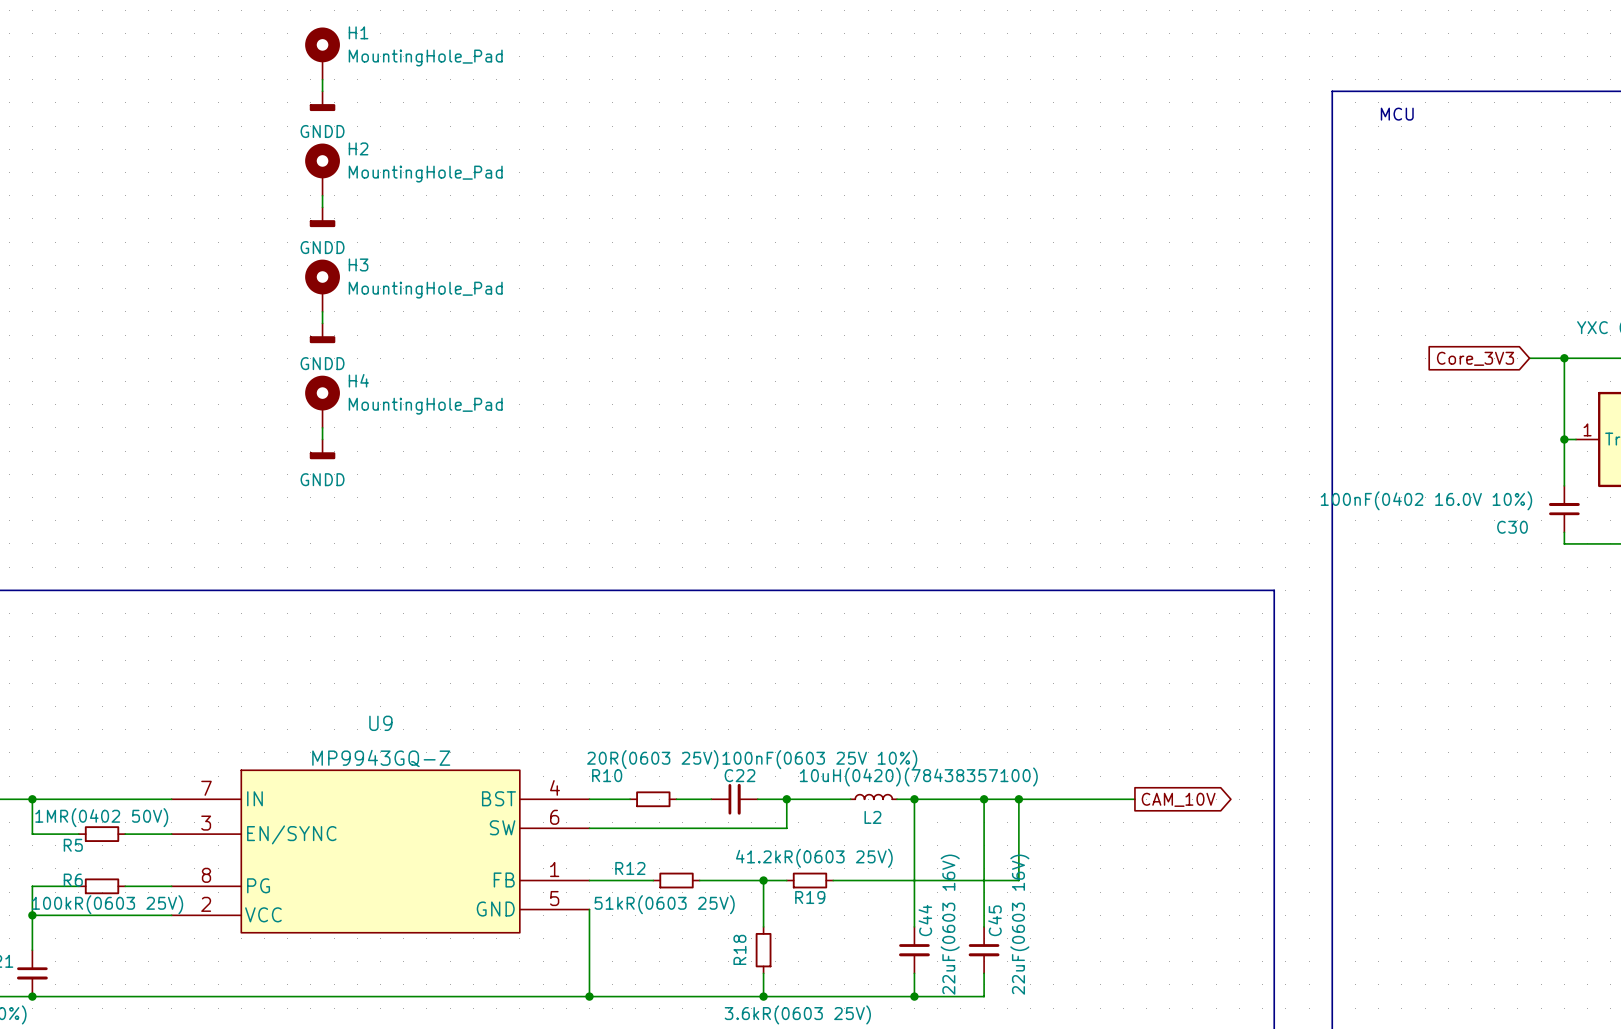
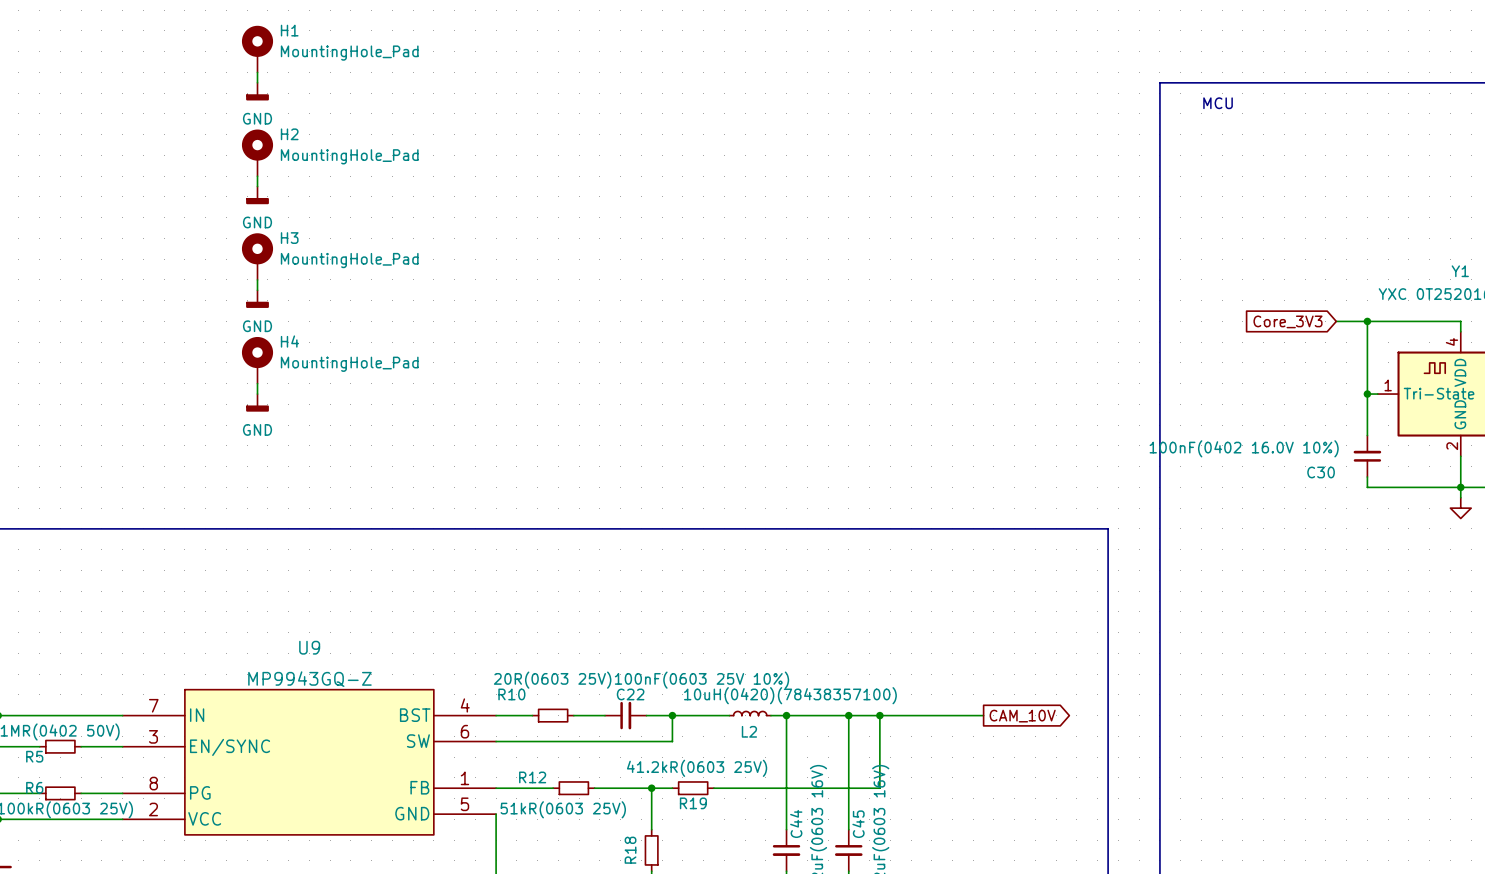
power symbol: GNDD (322, 101) -> GND (257, 91)
power symbol: GNDD (322, 217) -> GND (257, 195)
power symbol: GNDD (322, 333) -> GND (257, 299)
power symbol: GNDD (322, 449) -> GND (257, 402)

